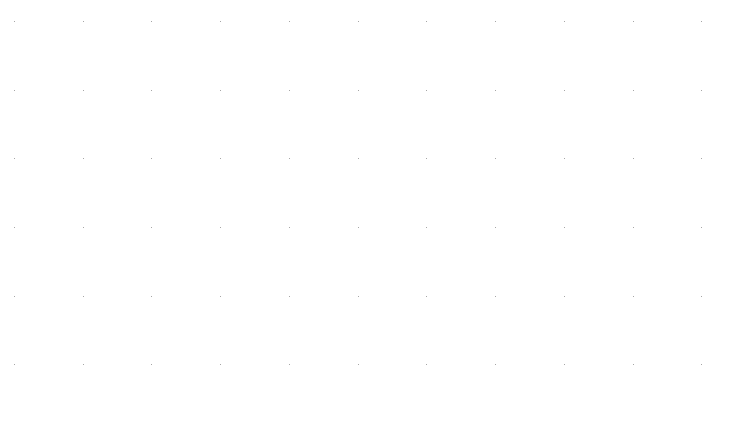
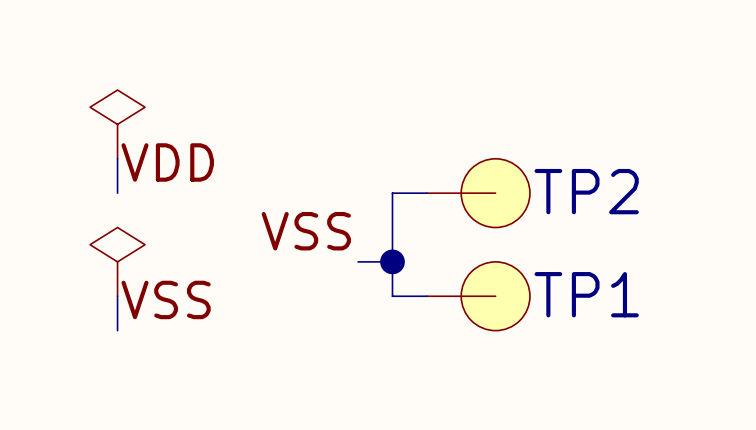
power symbol: none -> (117, 124)
wire: none -> (117, 158) (117, 193)
label: none -> VDD (167, 162)
wire: none -> (426, 193) (392, 193) (392, 296) (426, 296)
TP2: none -> (478, 193)
label: none -> VSS (306, 231)
power symbol: none -> (117, 261)
wire: none -> (358, 261) (392, 261)
junction: none -> (392, 261)
wire: none -> (117, 296) (117, 330)
TP1: none -> (478, 296)
label: none -> VSS (166, 299)

